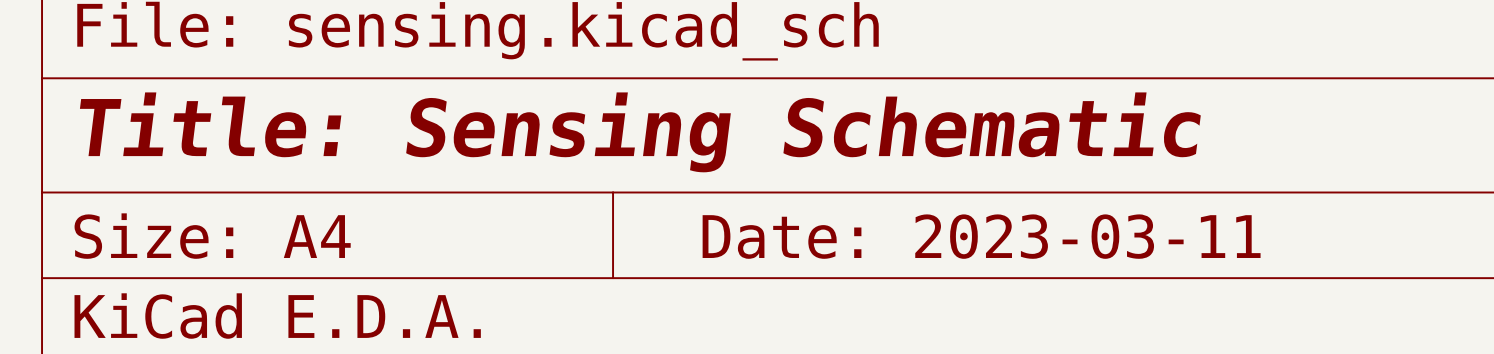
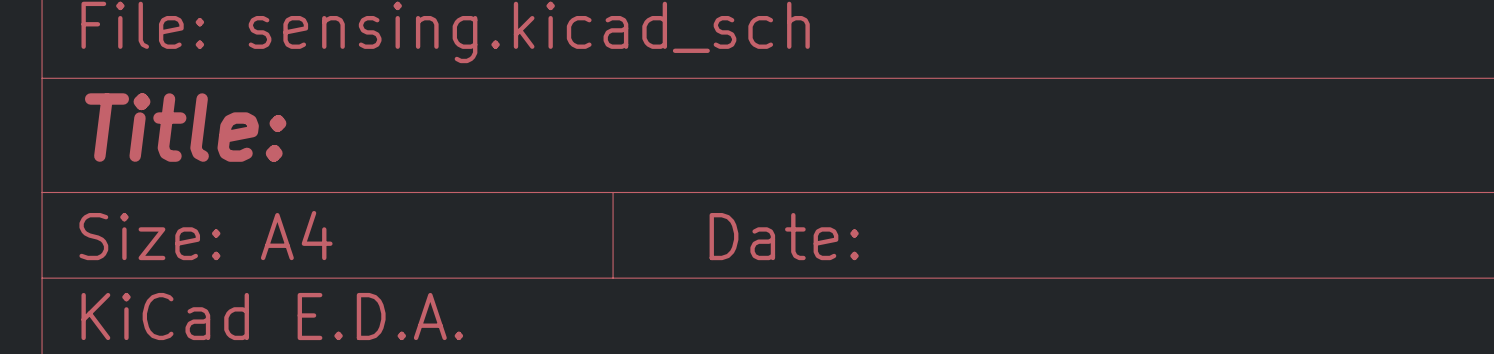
title block: Title: Sensing Schematic (640, 132) -> Title: (185, 127)
title block: Date: 2023-03-11 (981, 236) -> Date: (784, 236)

